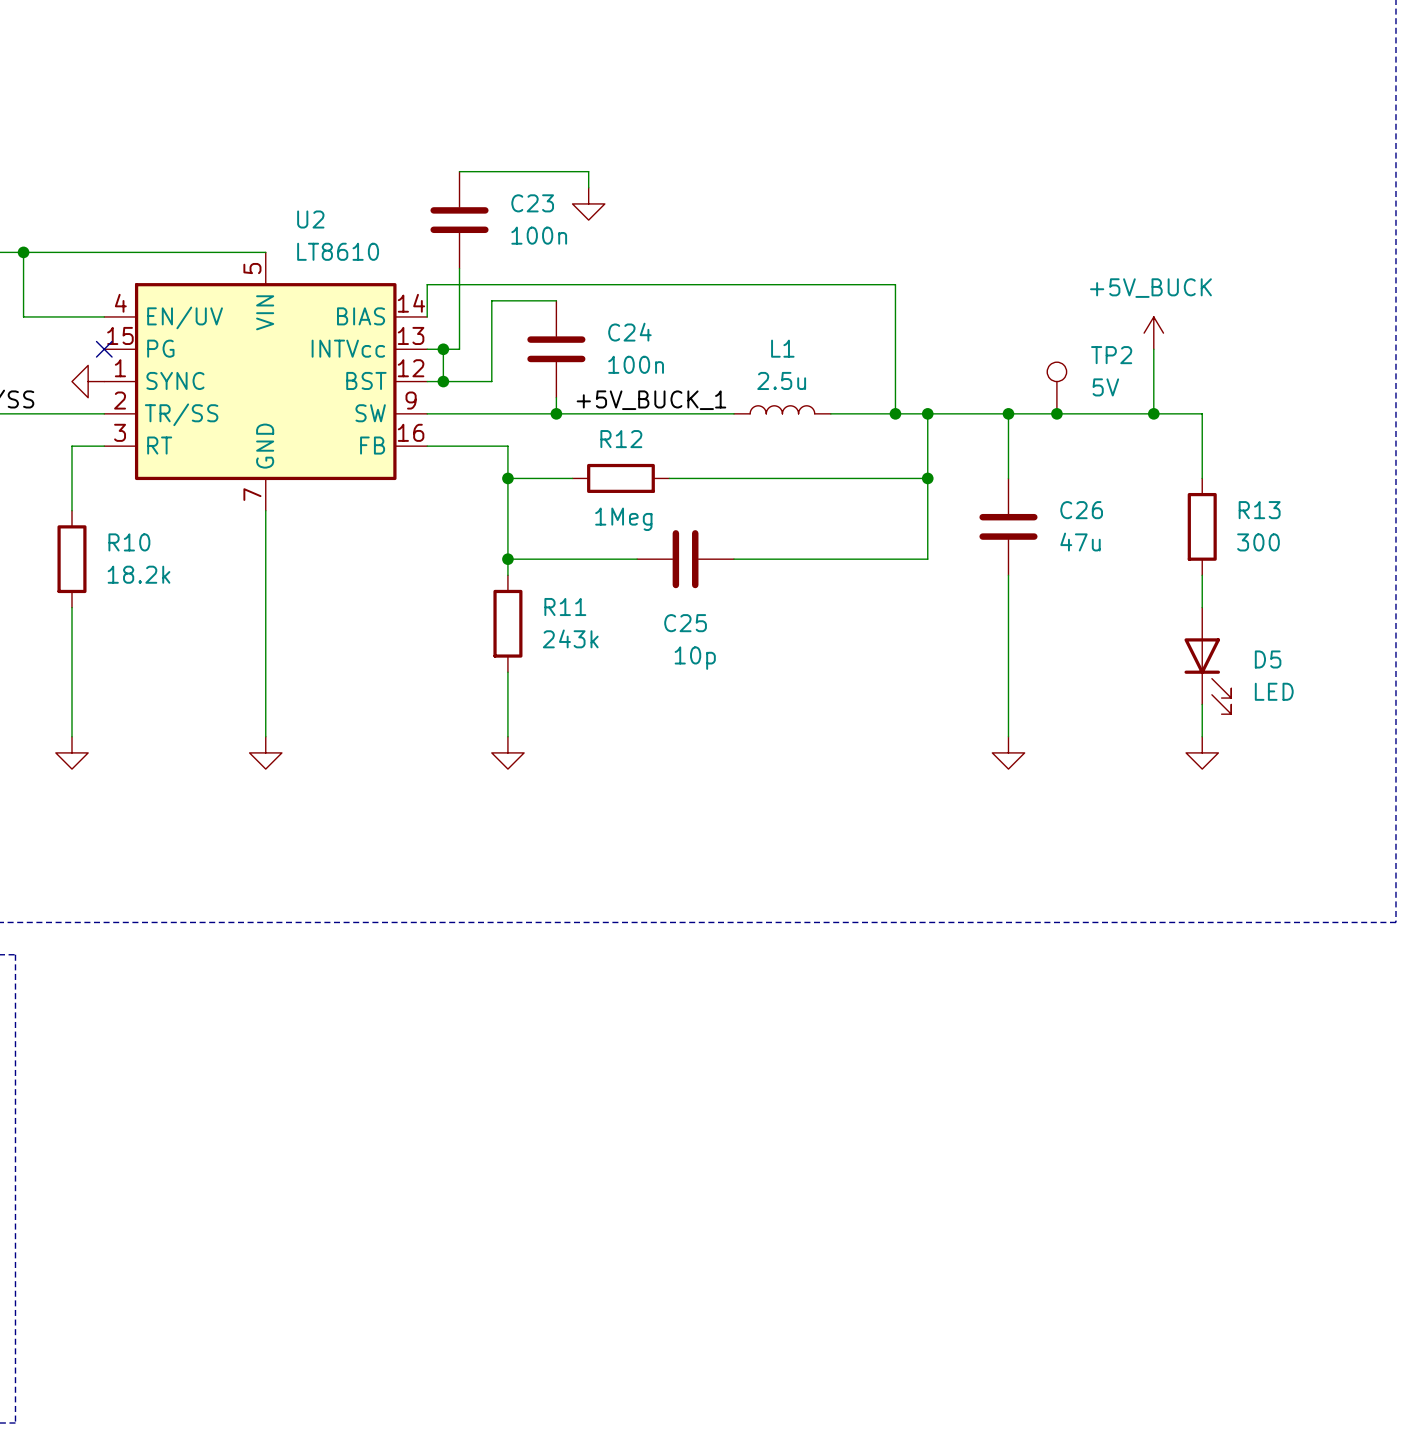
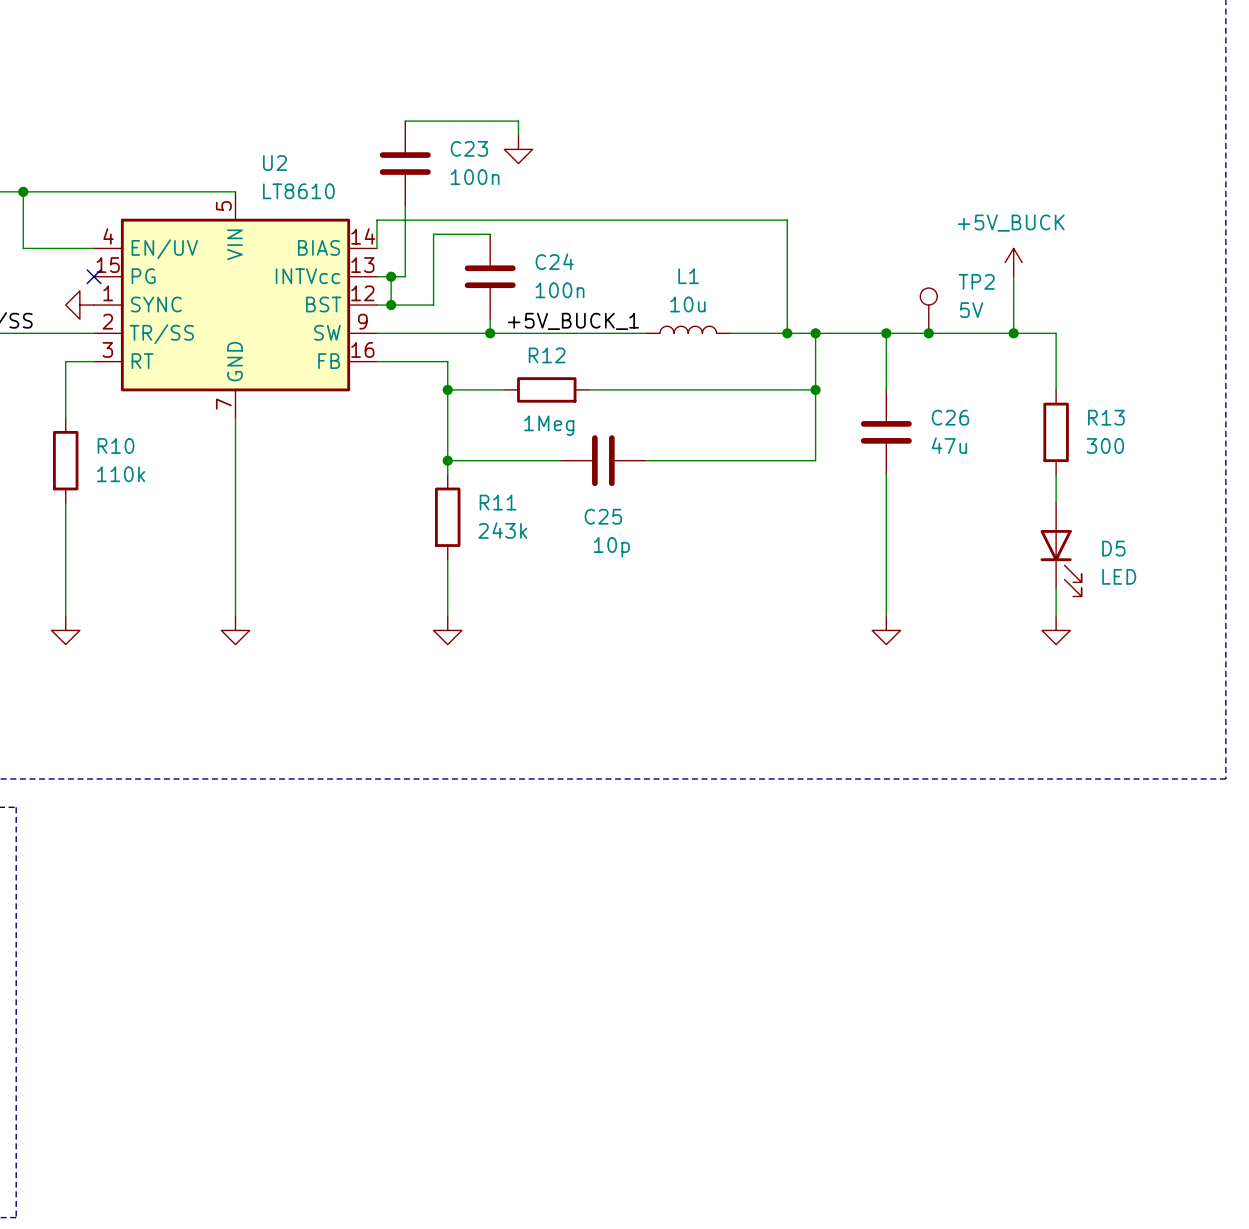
L1 value: 2.5u (781, 380) -> 10u (687, 304)
R10 value: 18.2k (139, 574) -> 110k (121, 474)

